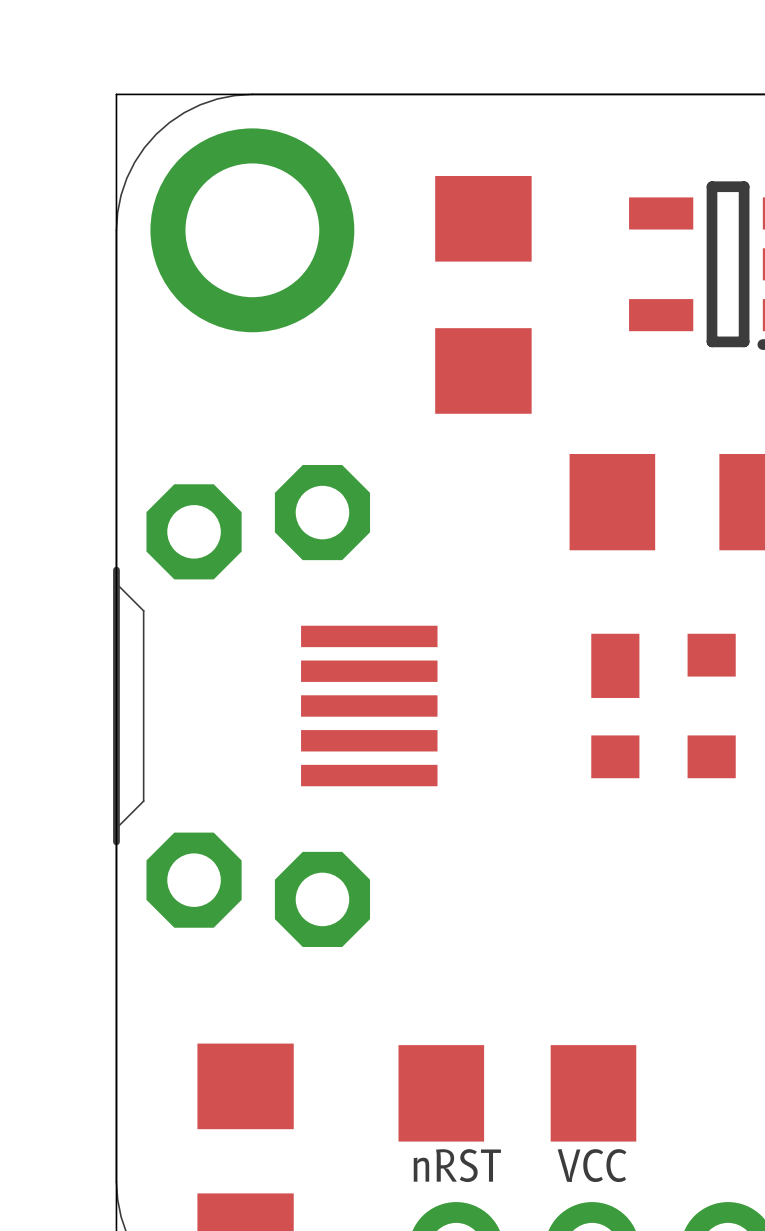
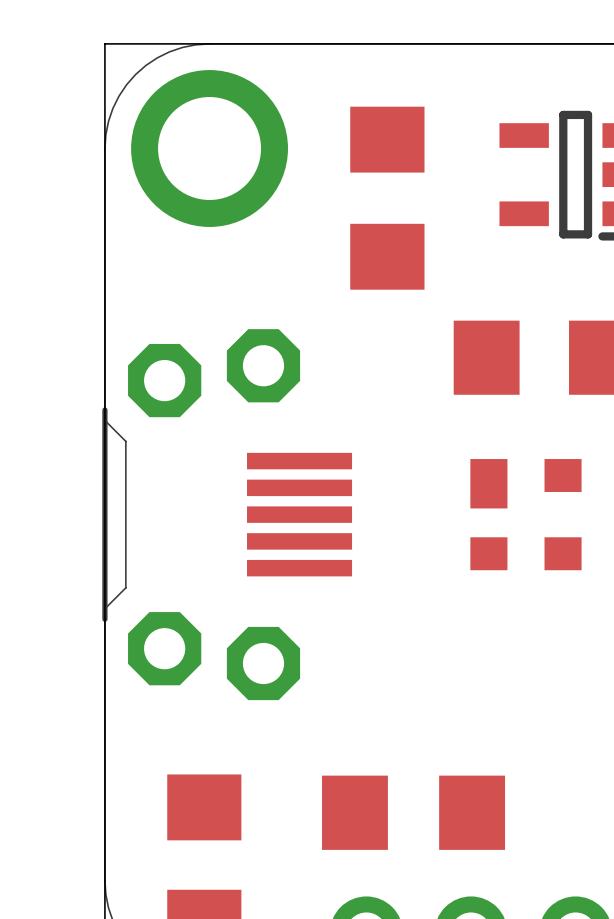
text: nRST (457, 1165) -> none
text: VCC (592, 1165) -> none

